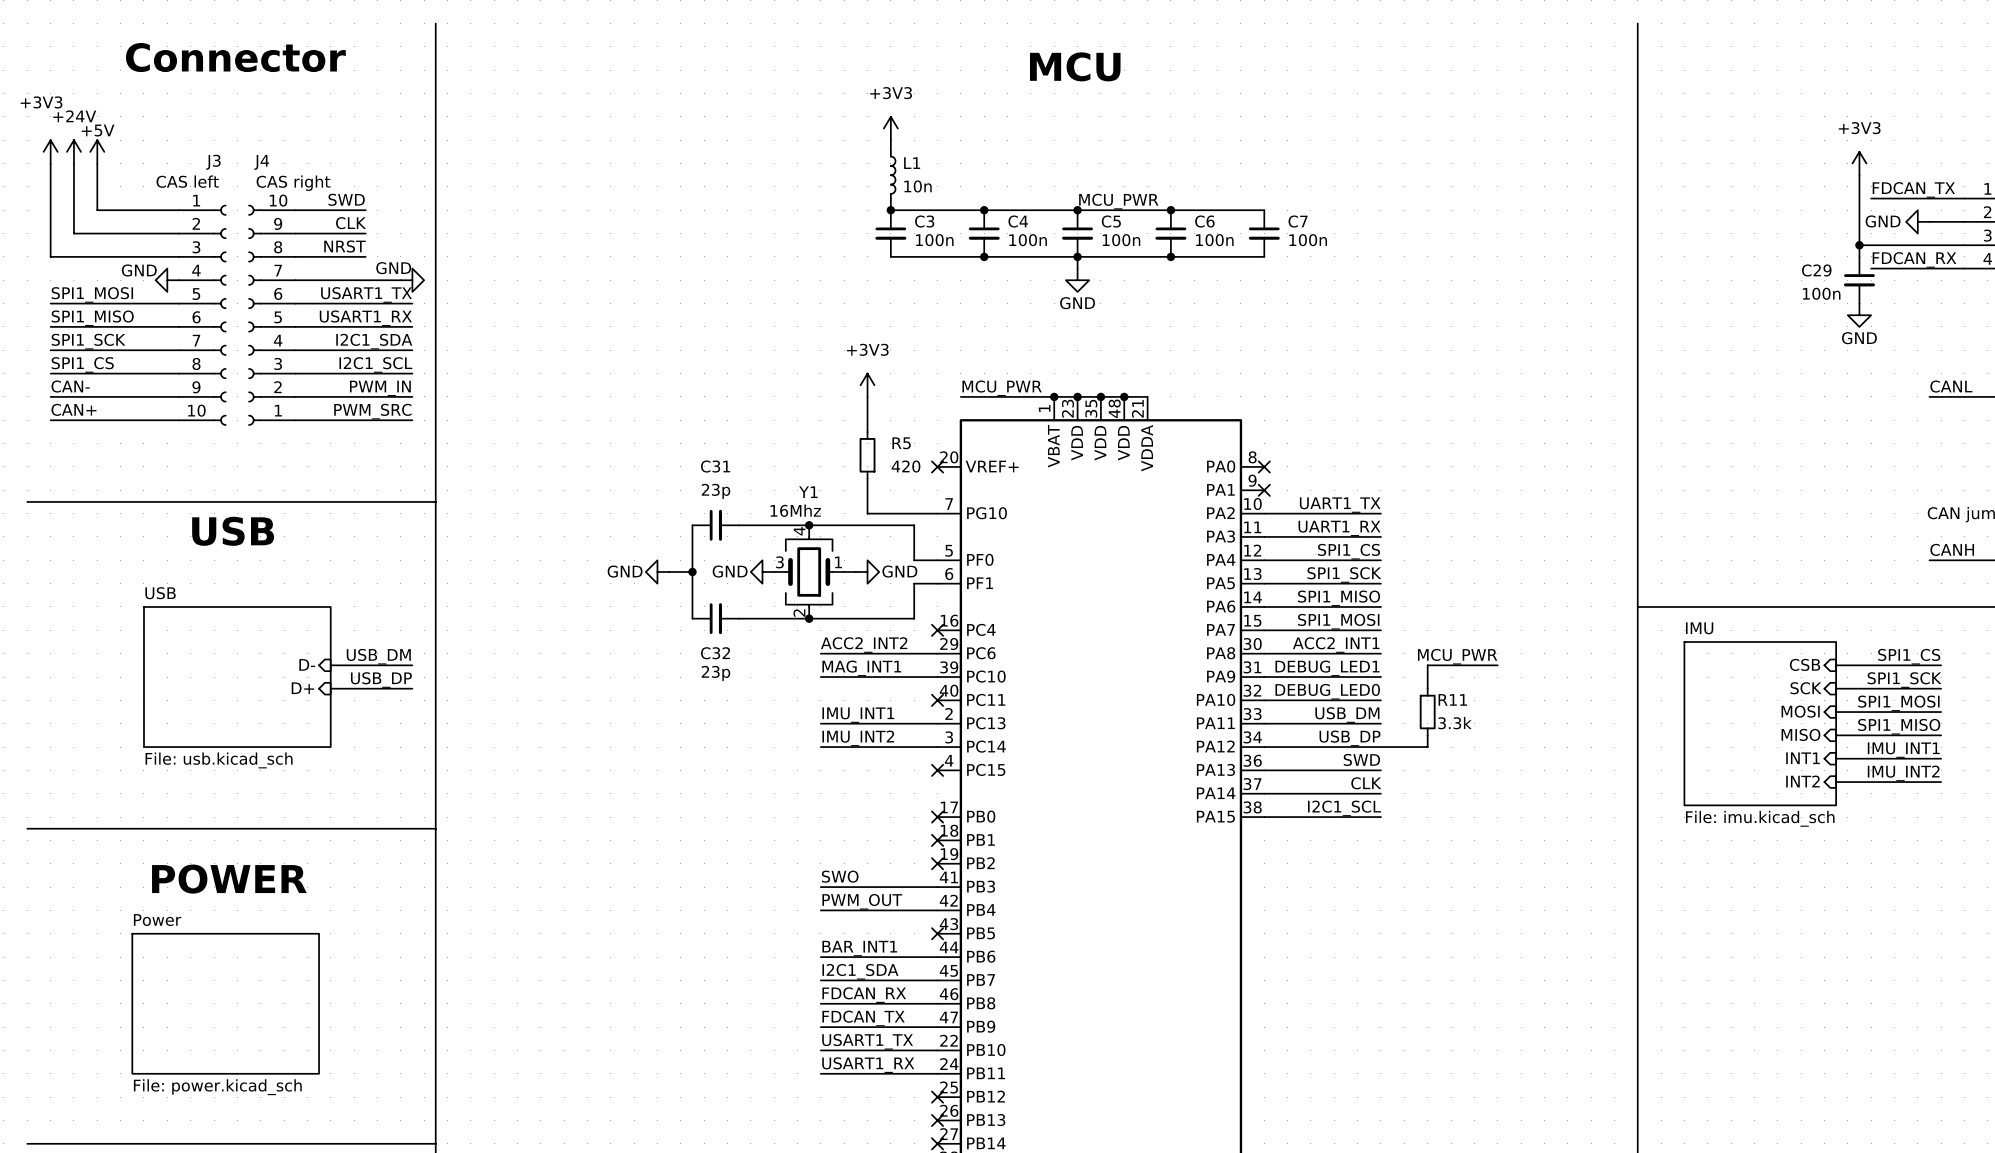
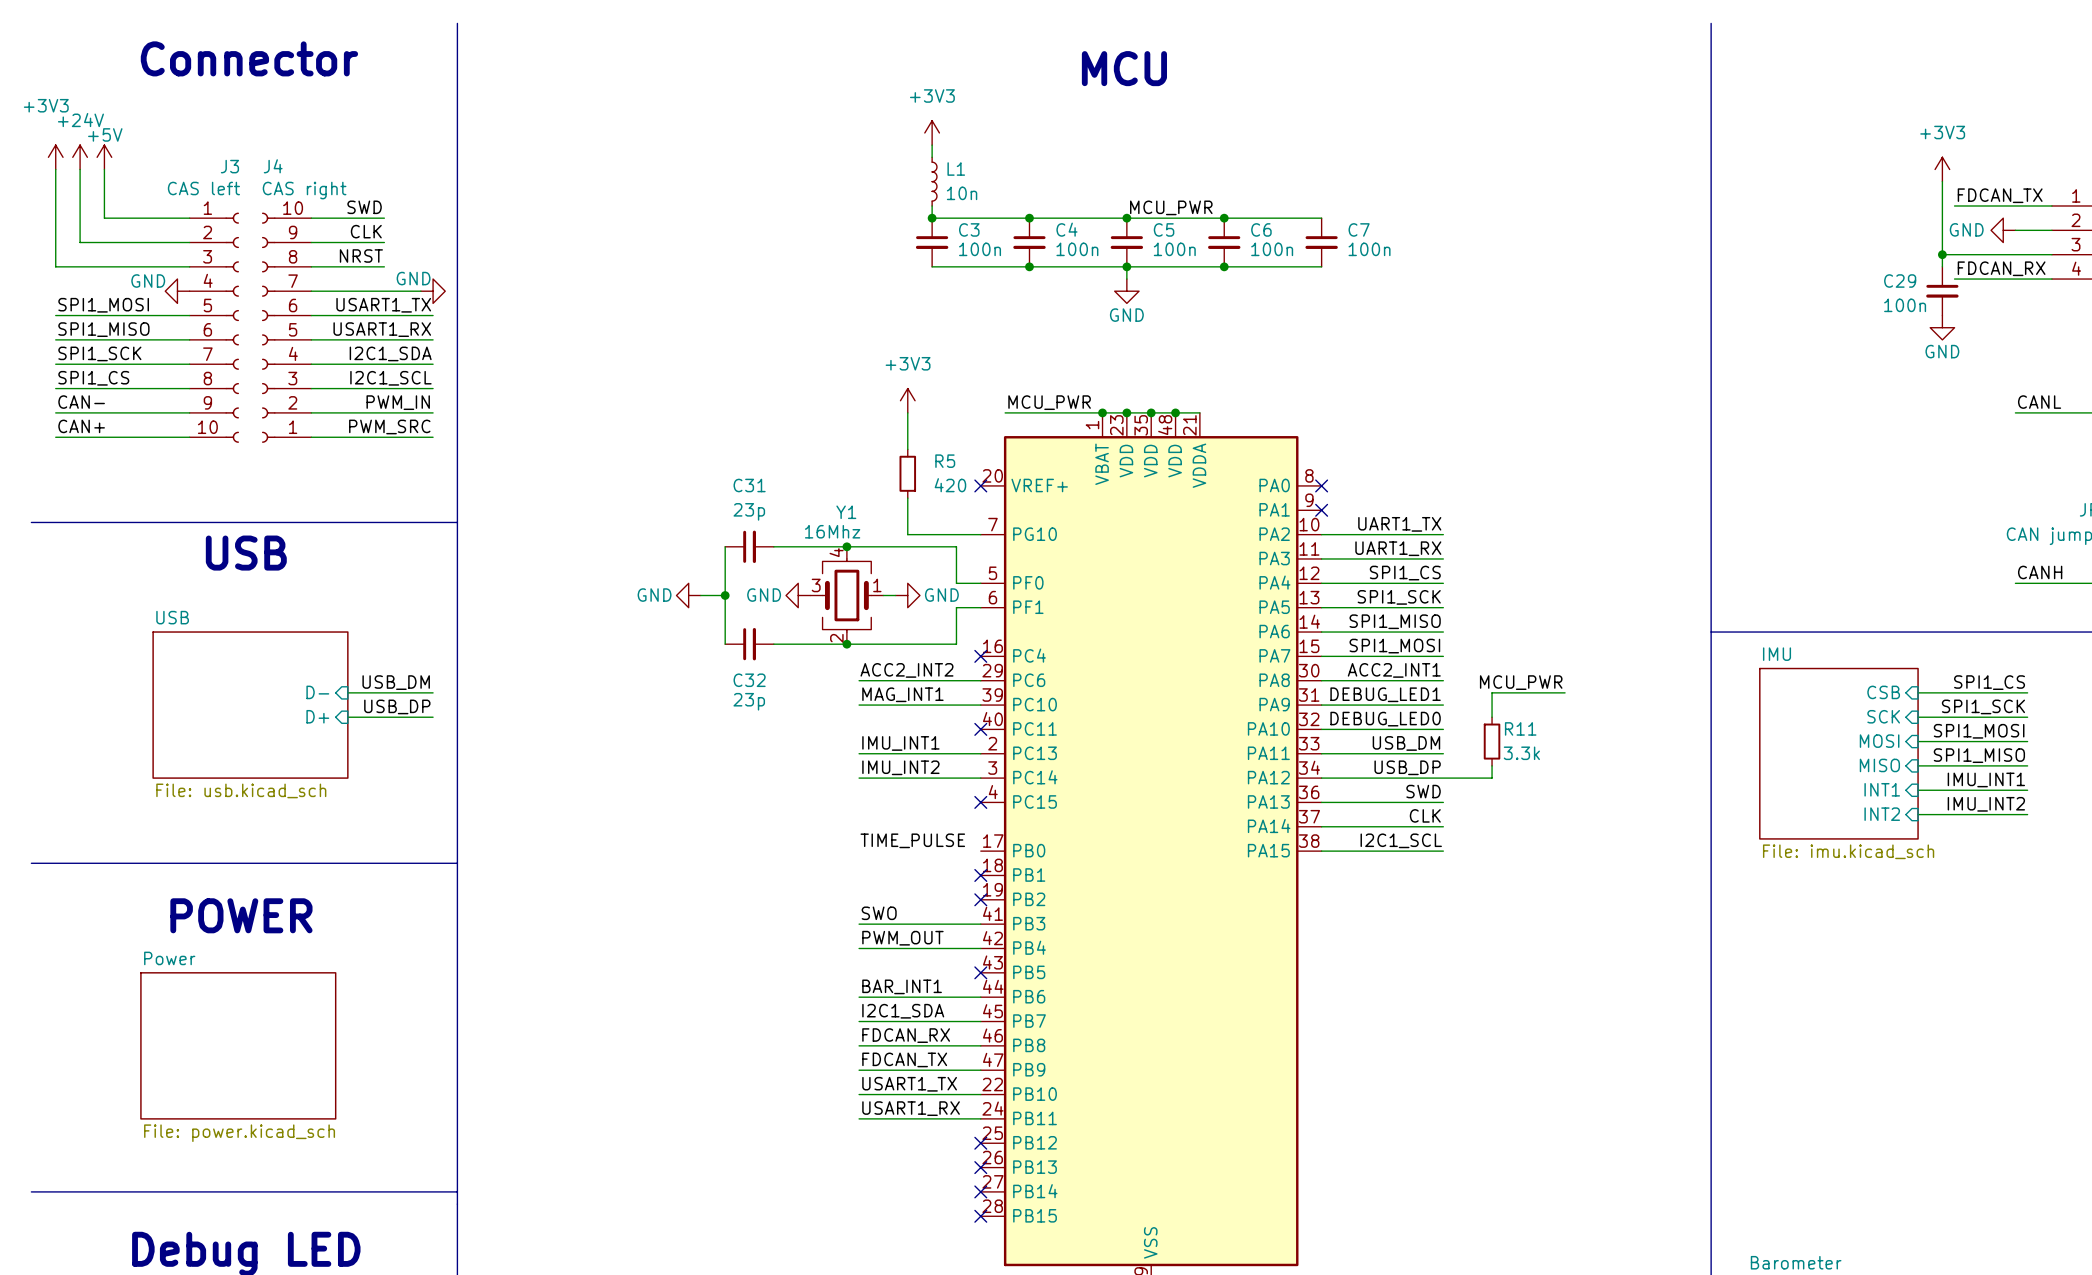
label: none -> TIME_PULSE (912, 840)
no-connect mark: (937, 817) -> none

